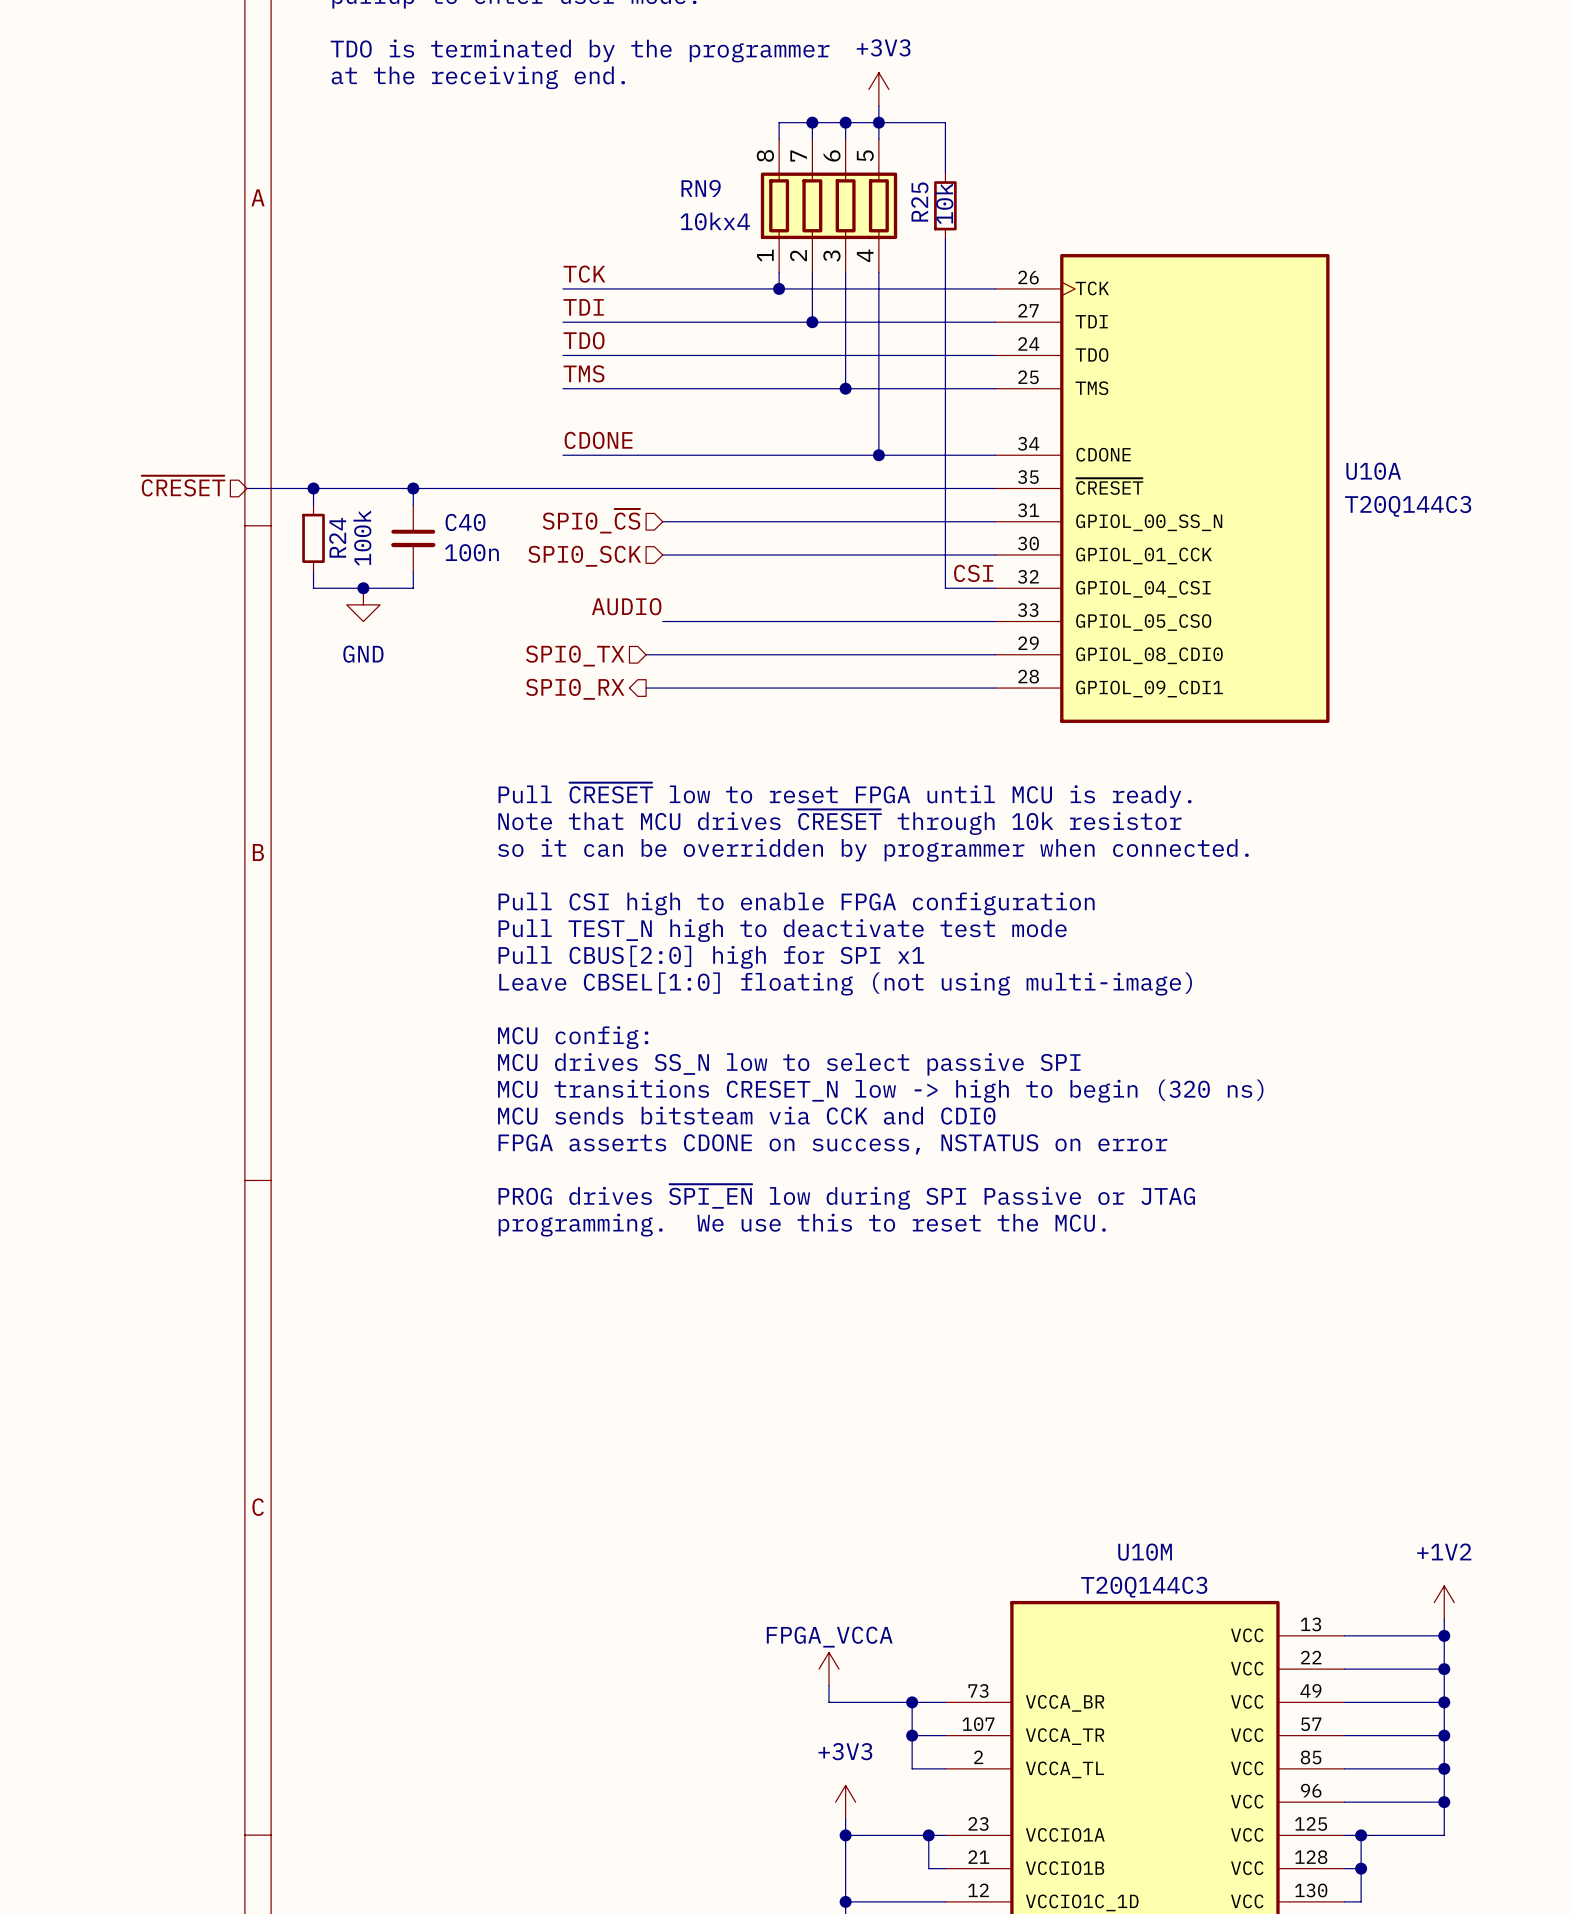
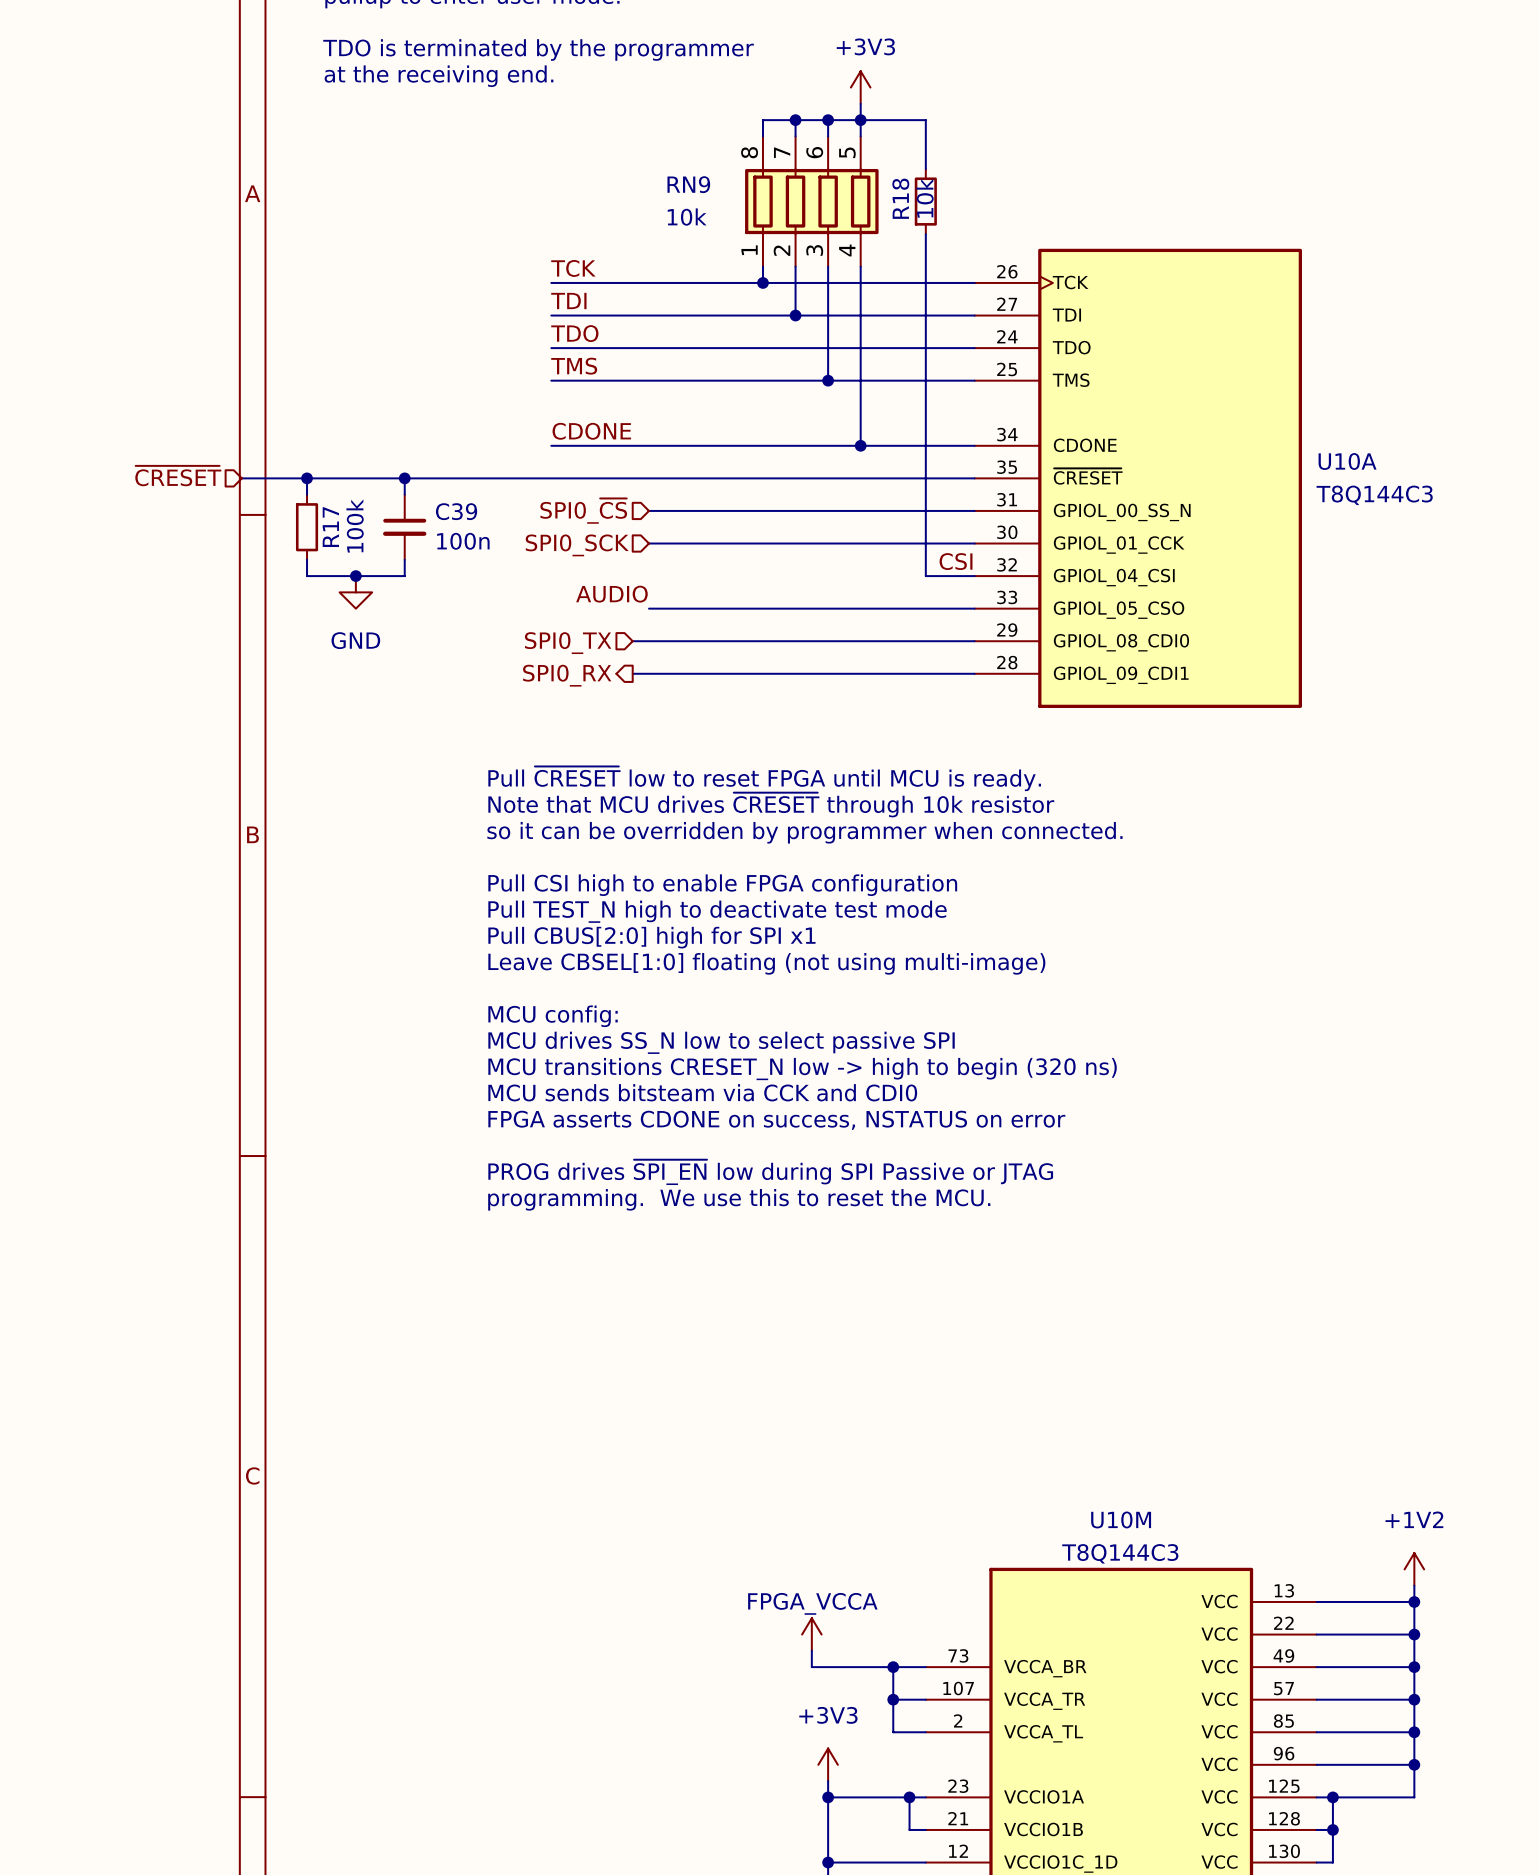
R25 name: R25 (919, 202) -> R18 (900, 198)
RN9 value: 10kx4 (715, 221) -> 10k (687, 217)
U10A value: T20Q144C3 (1408, 506) -> T8Q144C3 (1374, 495)
C40 name: C40 (465, 522) -> C39 (456, 511)
R24 name: R24 (337, 537) -> R17 (330, 527)
U10M value: T20Q144C3 (1144, 1587) -> T8Q144C3 (1120, 1553)

